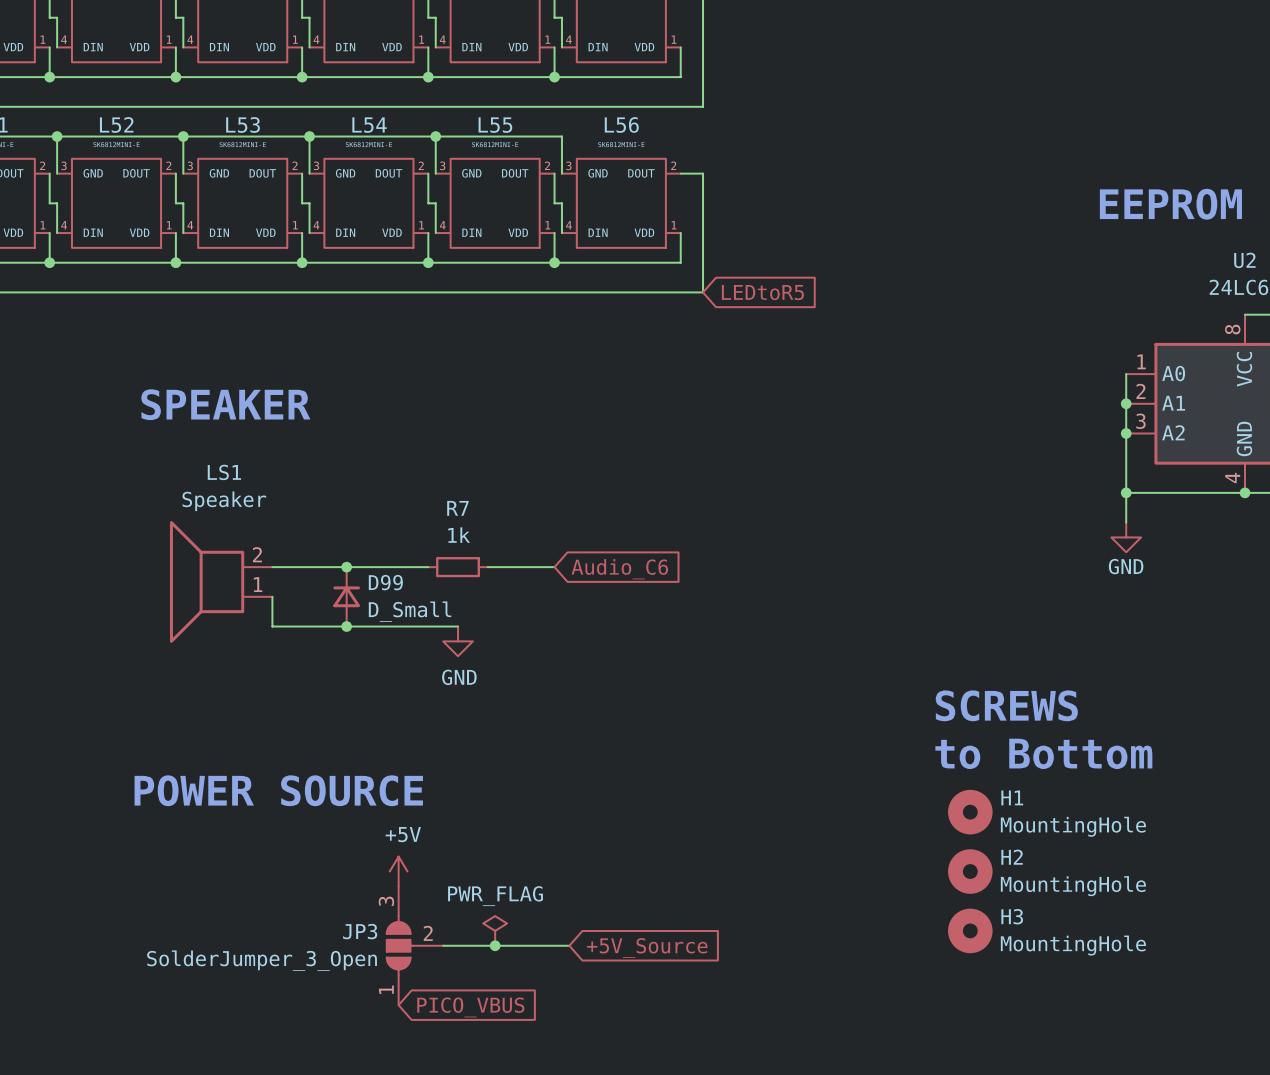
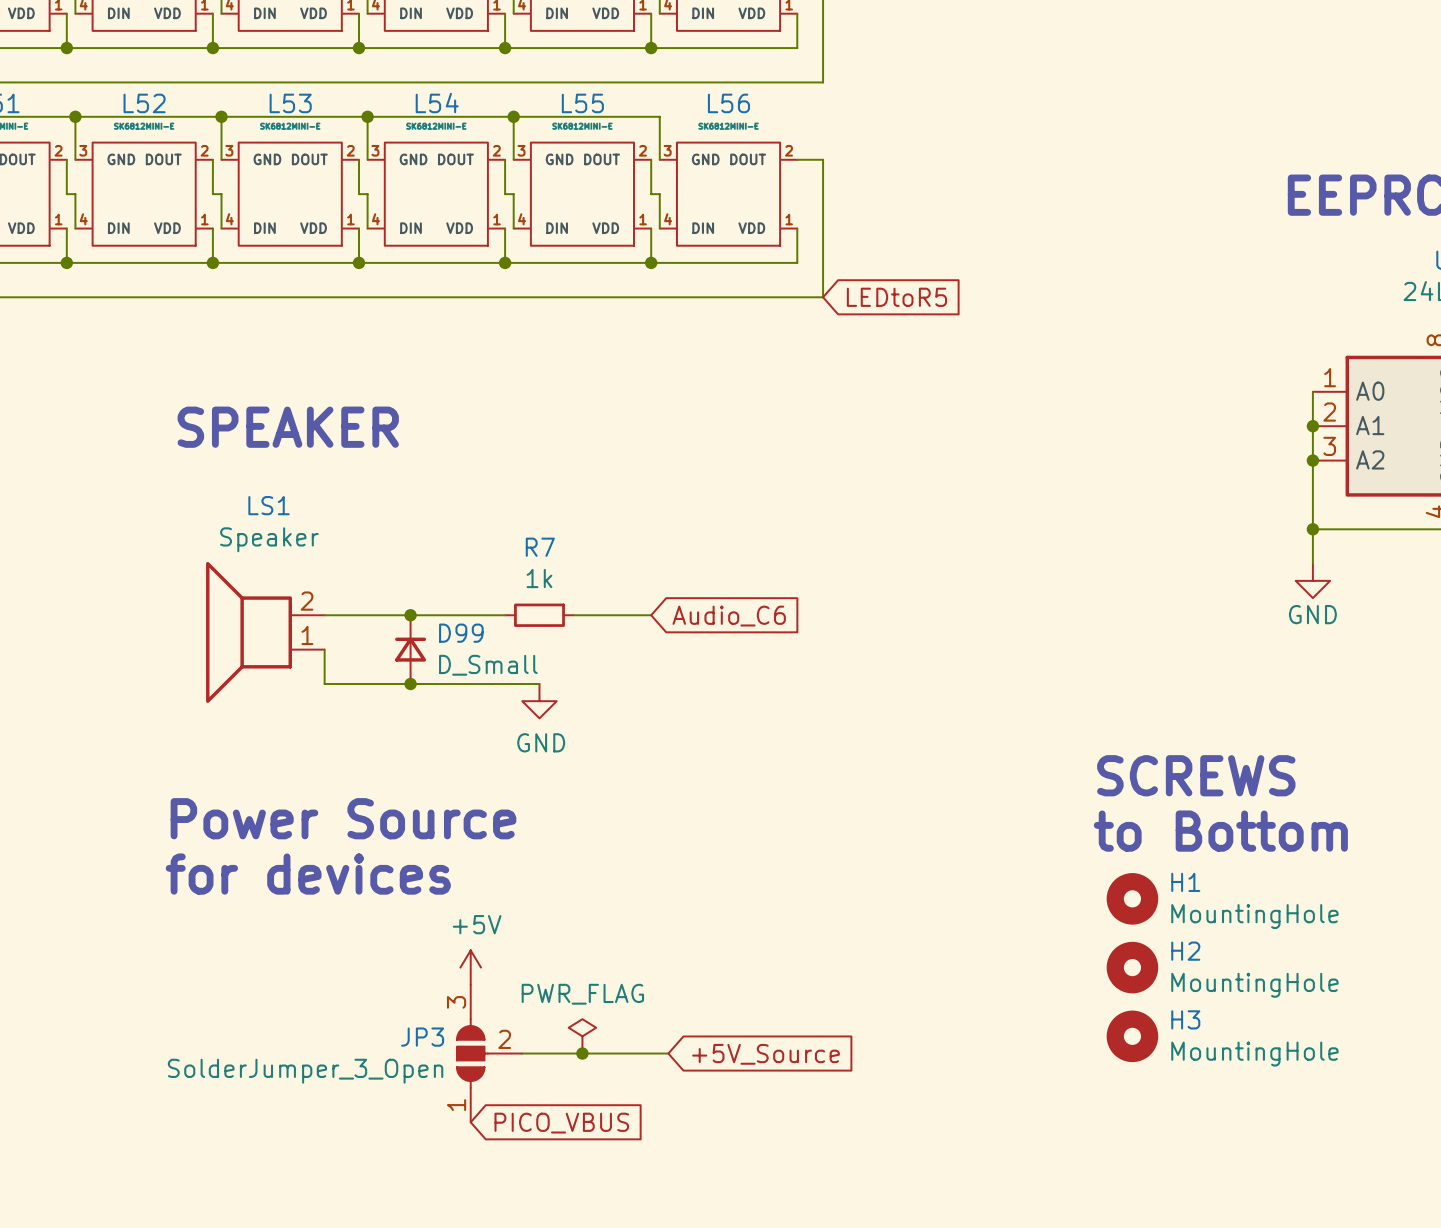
text: none -> Power Source (343, 818)
text: POWER SOURCE (278, 790) -> for devices (308, 874)

